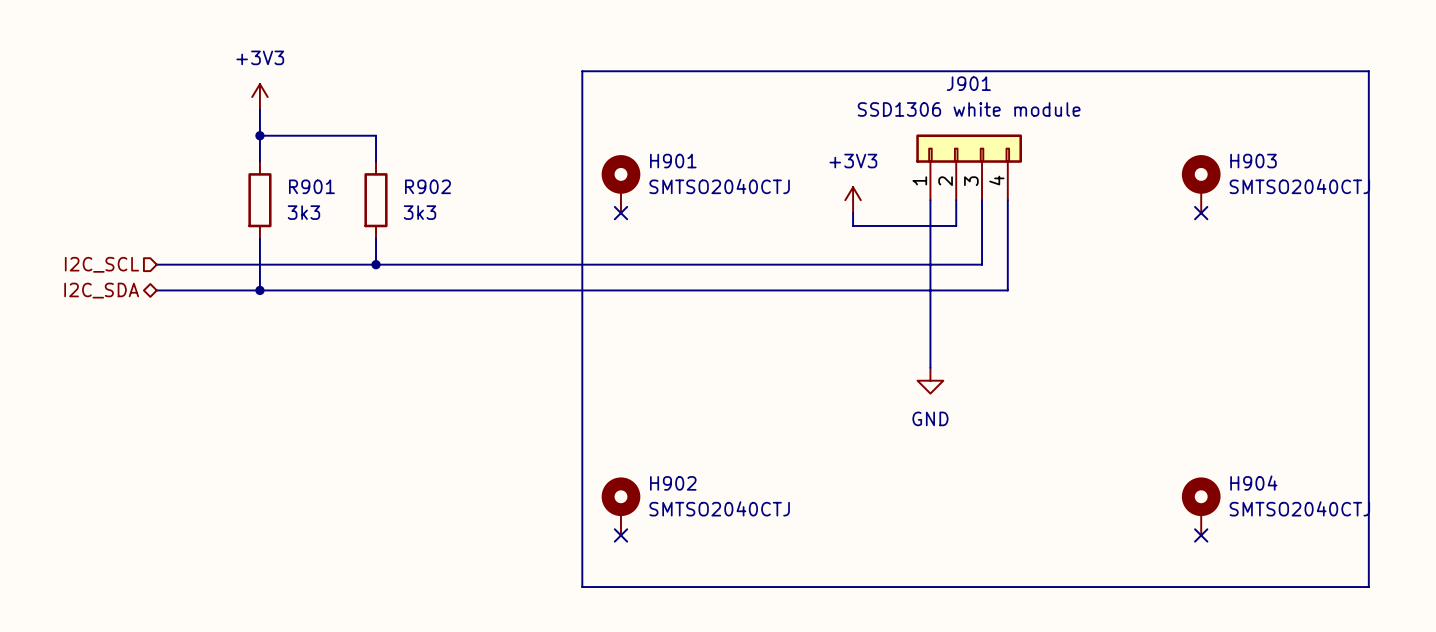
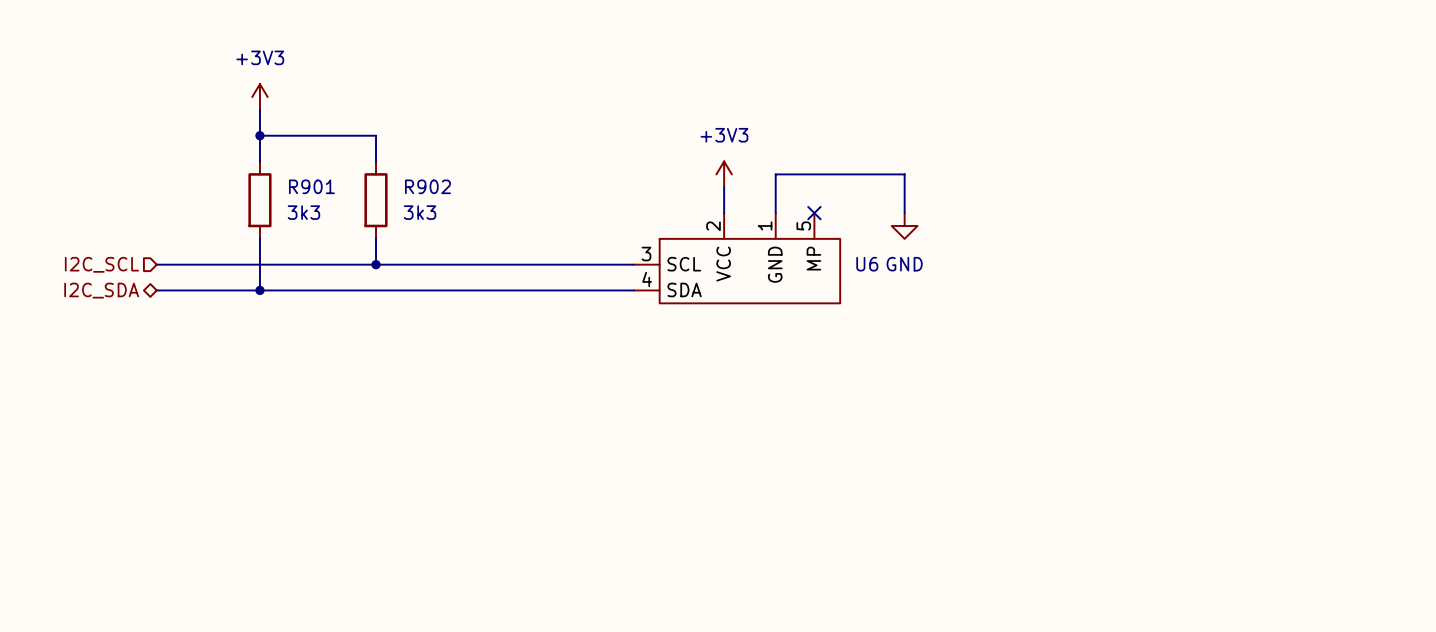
line: (582, 71) (1368, 71) (1368, 587) (582, 587) (582, 71) -> none
J901: SSD1306 white module (969, 167) -> none
H901: SMTSO2040CTJ (620, 184) -> none
H903: SMTSO2040CTJ (1201, 184) -> none
wire: none -> (724, 187) (724, 213)
power symbol position: +3V3 (853, 200) -> +3V3 (724, 174)
wire: (930, 200) (930, 367) -> none
wire: (956, 200) (956, 225) (853, 225) (853, 213) -> none
wire: (982, 200) (982, 264) (633, 264) -> none
wire: (1007, 200) (1007, 290) (633, 290) -> none
no-connect mark: (620, 213) -> none
wire: none -> (775, 213) (775, 174) (904, 174) (904, 213)
no-connect mark: none -> (814, 213)
no-connect mark: (1201, 213) -> none
U6: none -> (737, 258)
power symbol position: GND (930, 380) -> GND (904, 225)
H902: SMTSO2040CTJ (620, 506) -> none
H904: SMTSO2040CTJ (1201, 506) -> none
no-connect mark: (620, 535) -> none
no-connect mark: (1201, 535) -> none

